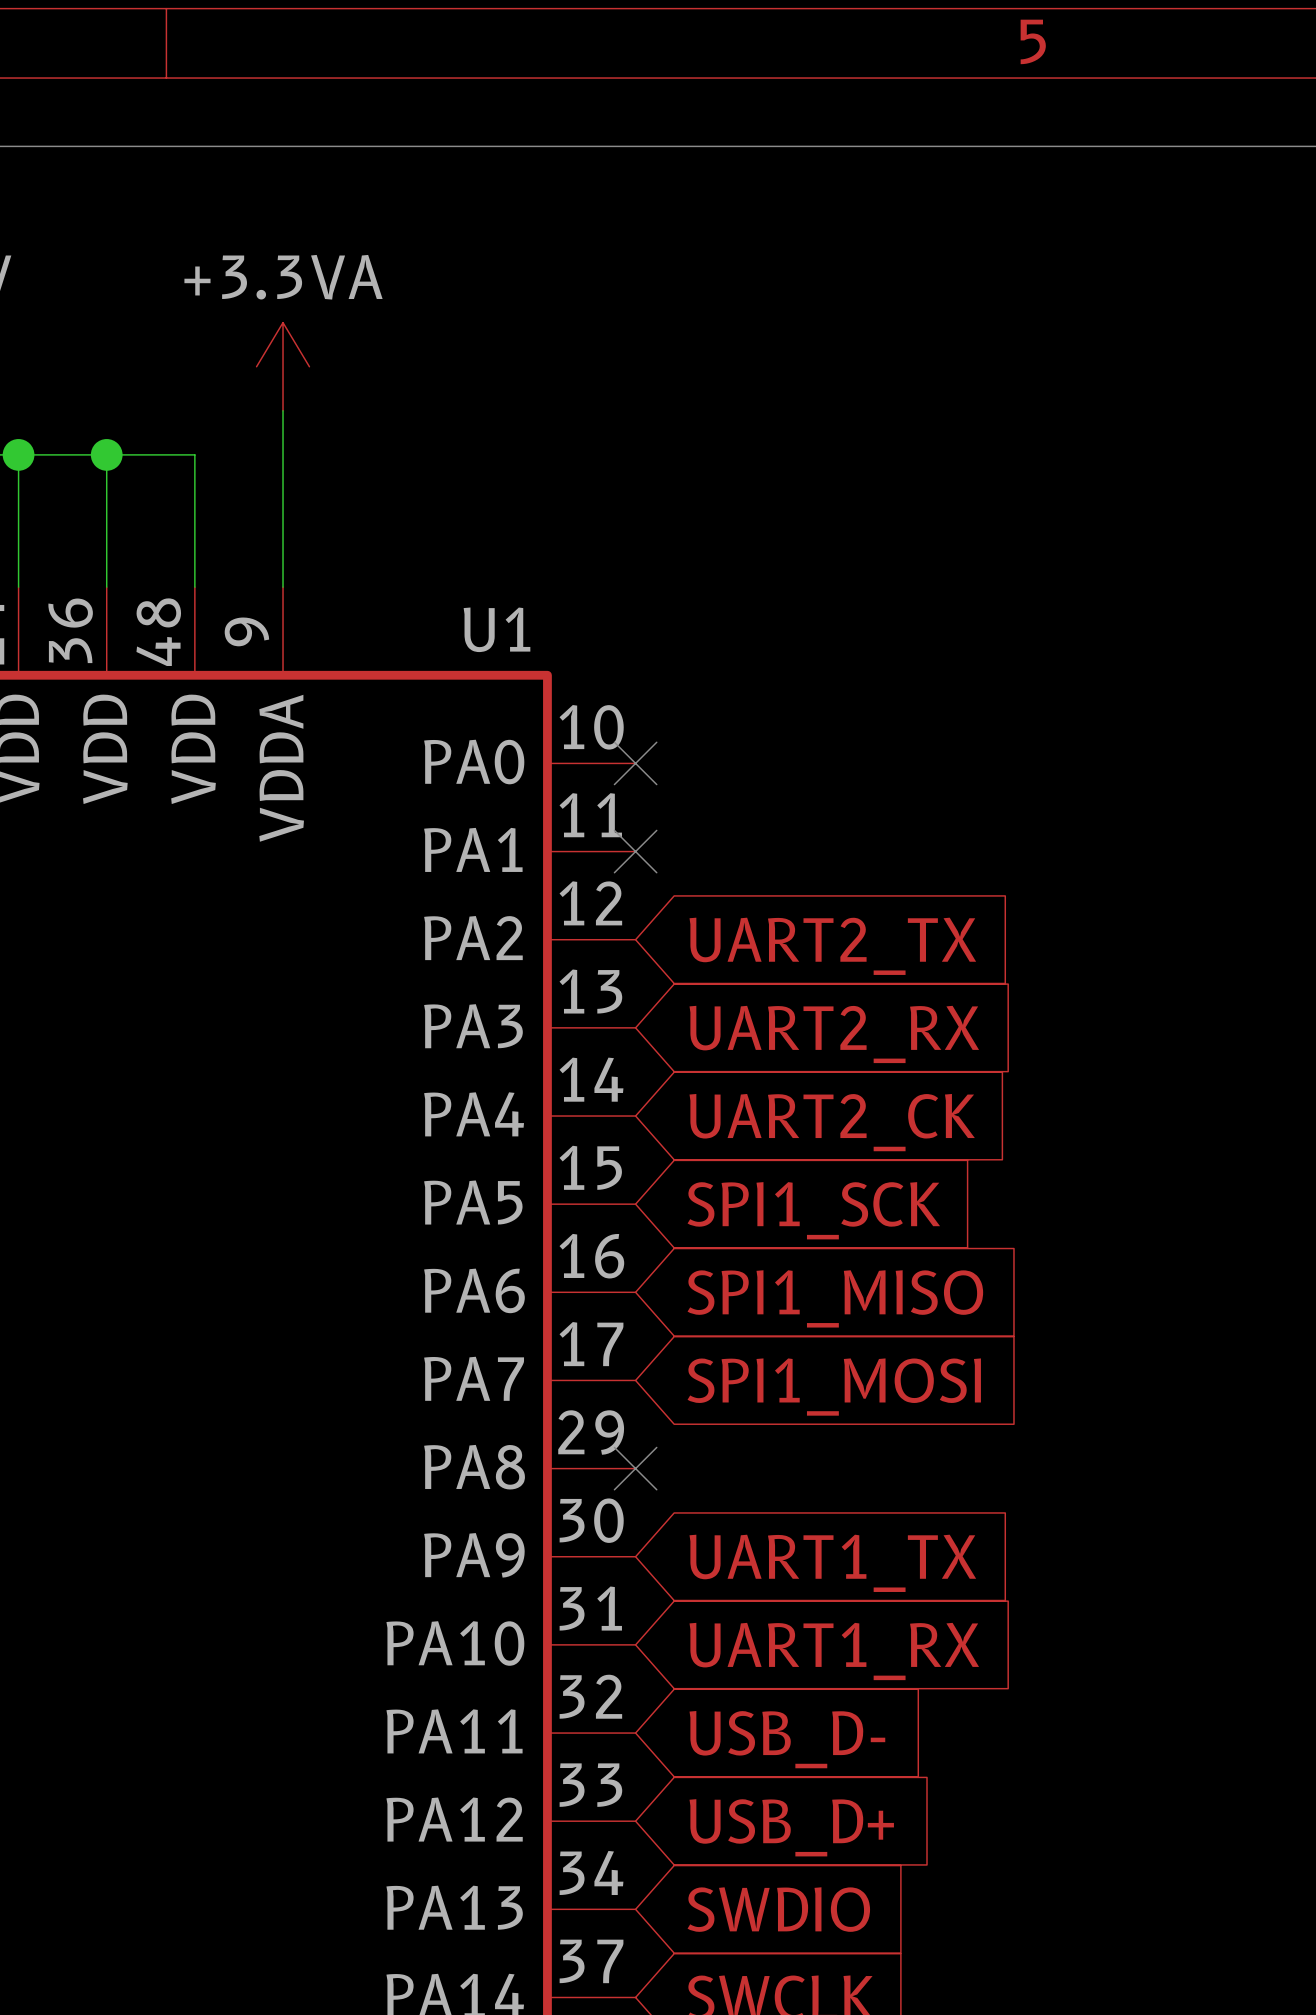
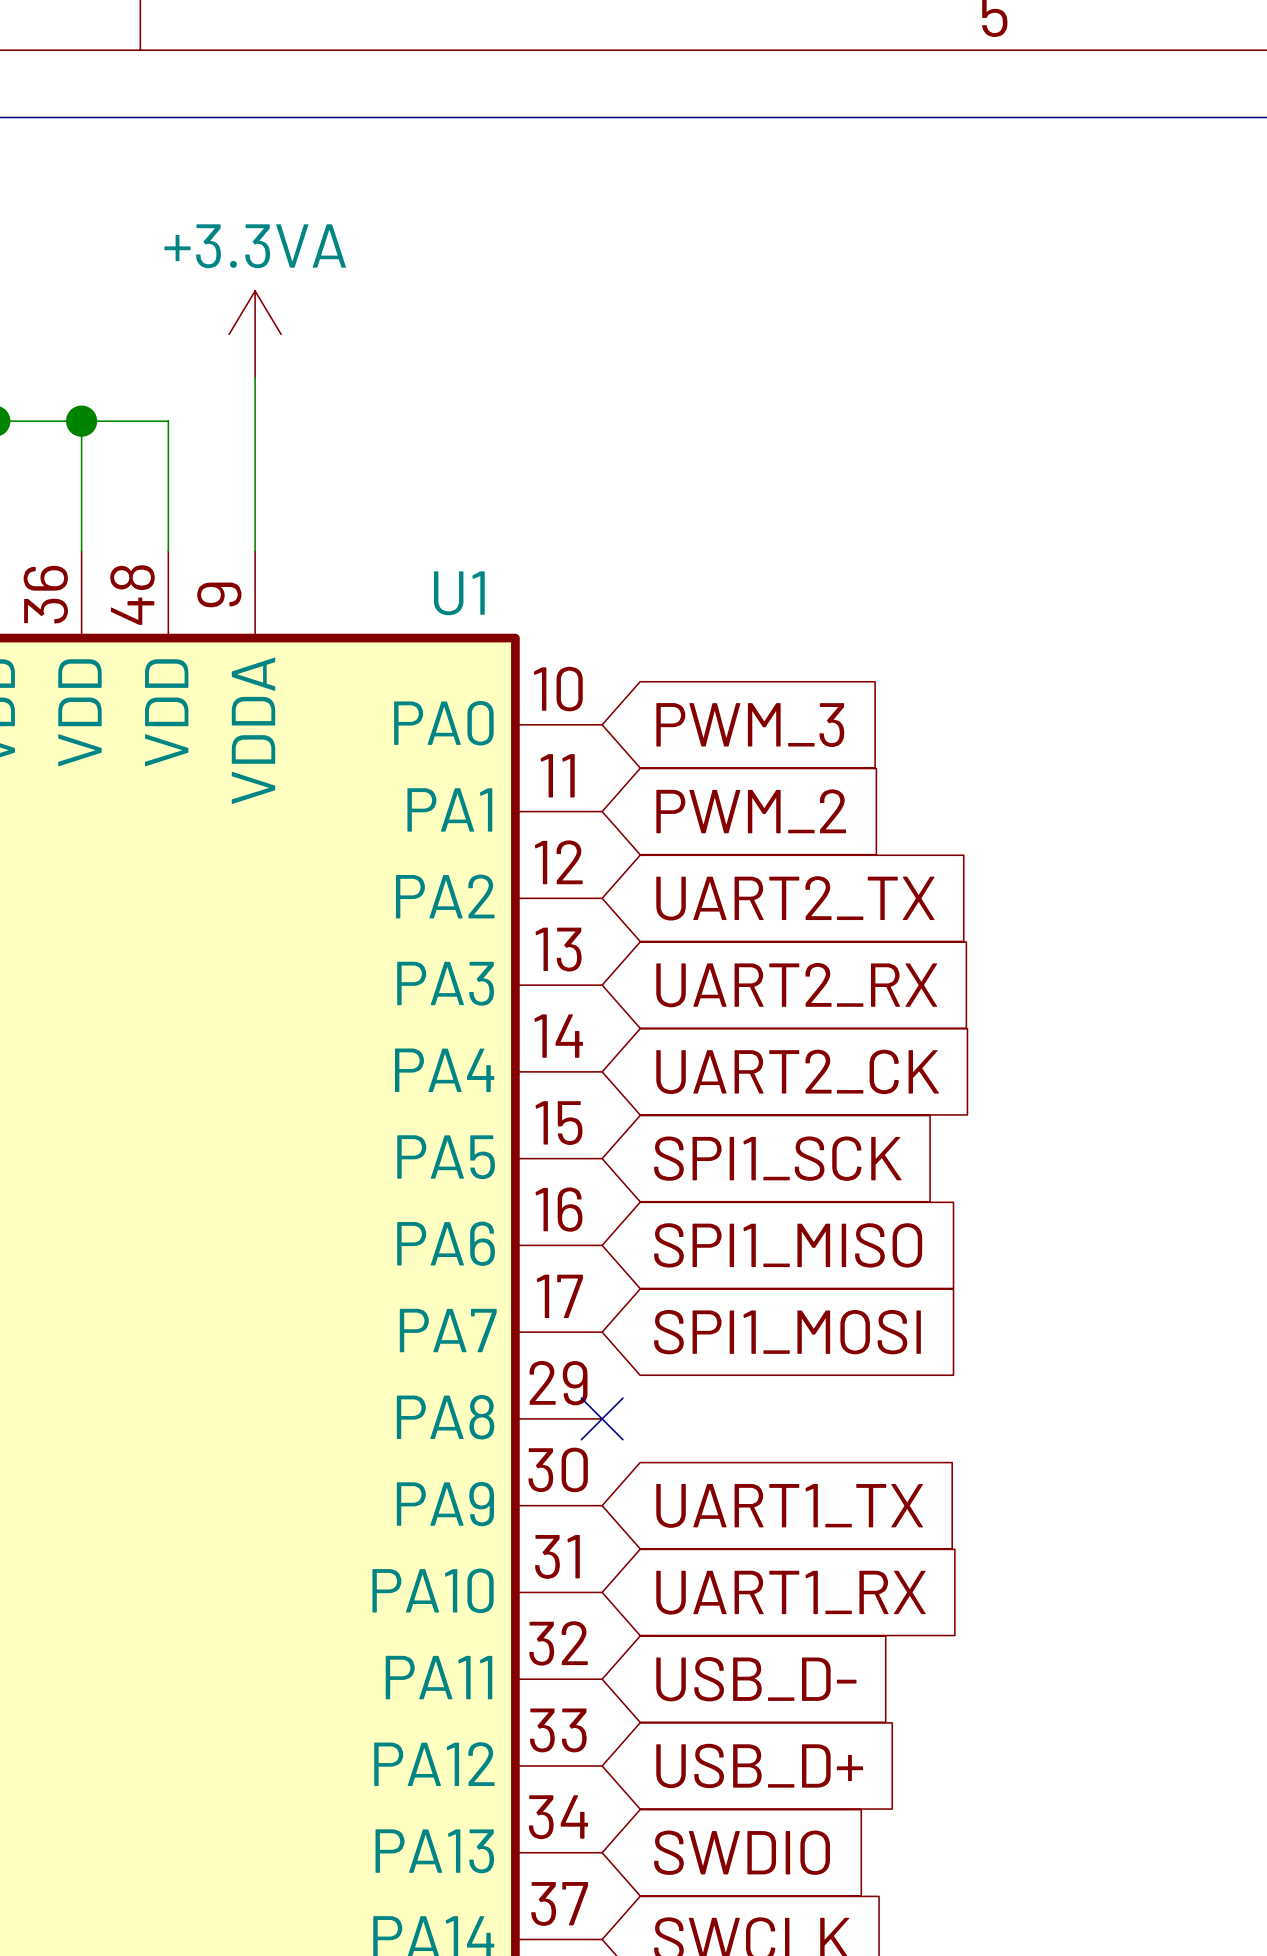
no-connect mark: (635, 763) -> none
global label: none -> PWM_3 (750, 725)
no-connect mark: (635, 851) -> none
global label: none -> PWM_2 (751, 811)

